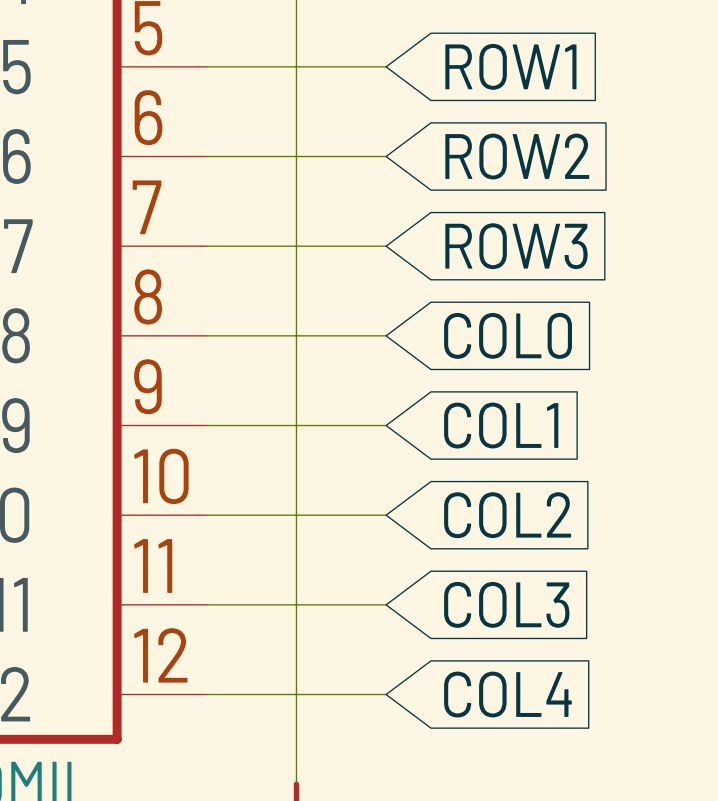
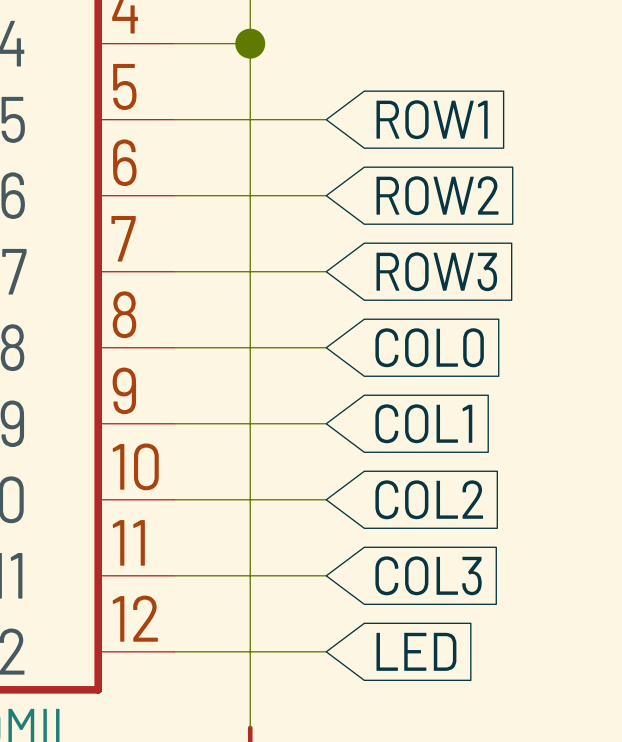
global label: COL4 (507, 694) -> LED (416, 651)

